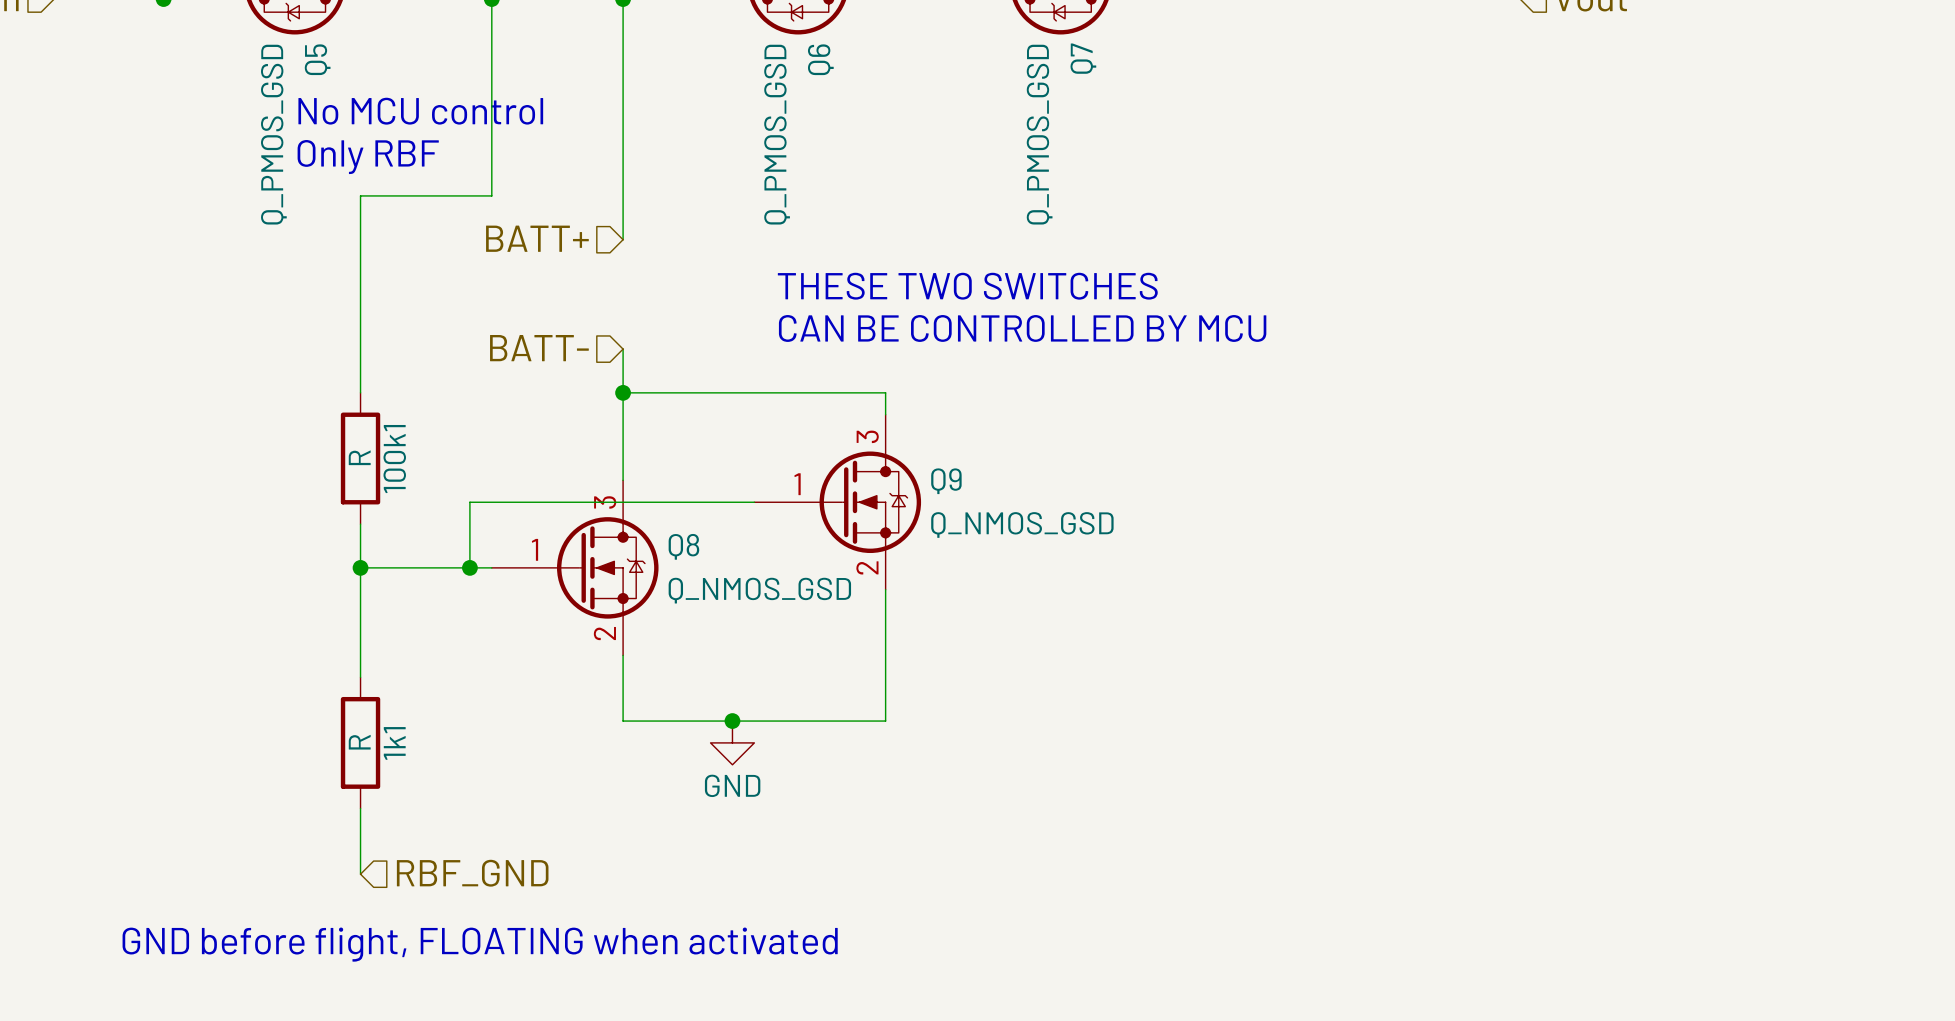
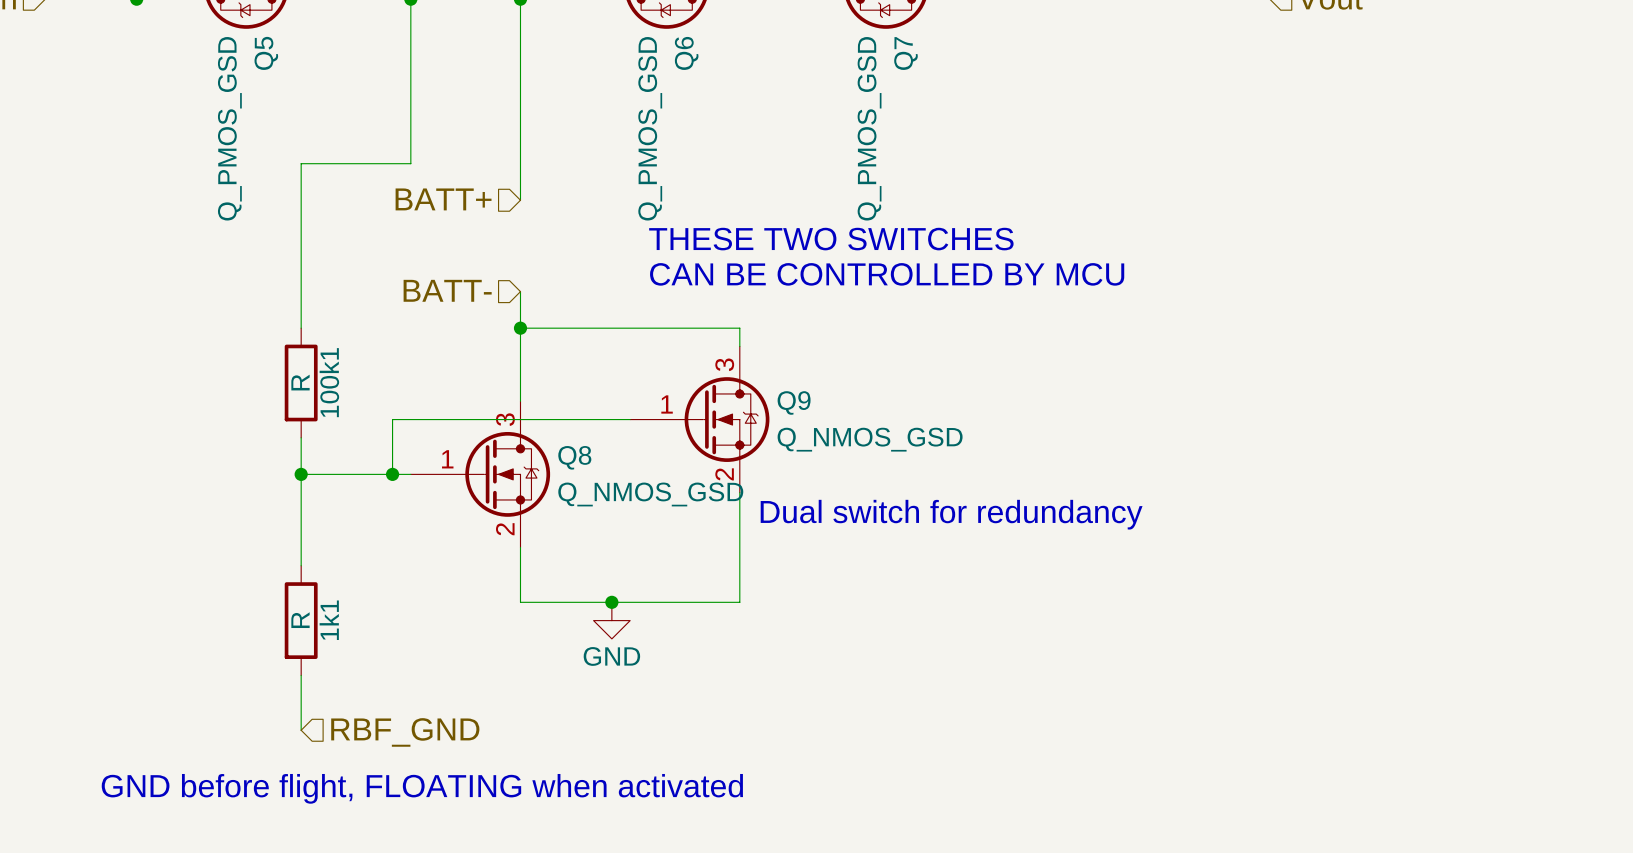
text: No MCU control (420, 111) -> none
text: Only RBF (368, 157) -> none
text: none -> Dual switch for redundancy (951, 514)

